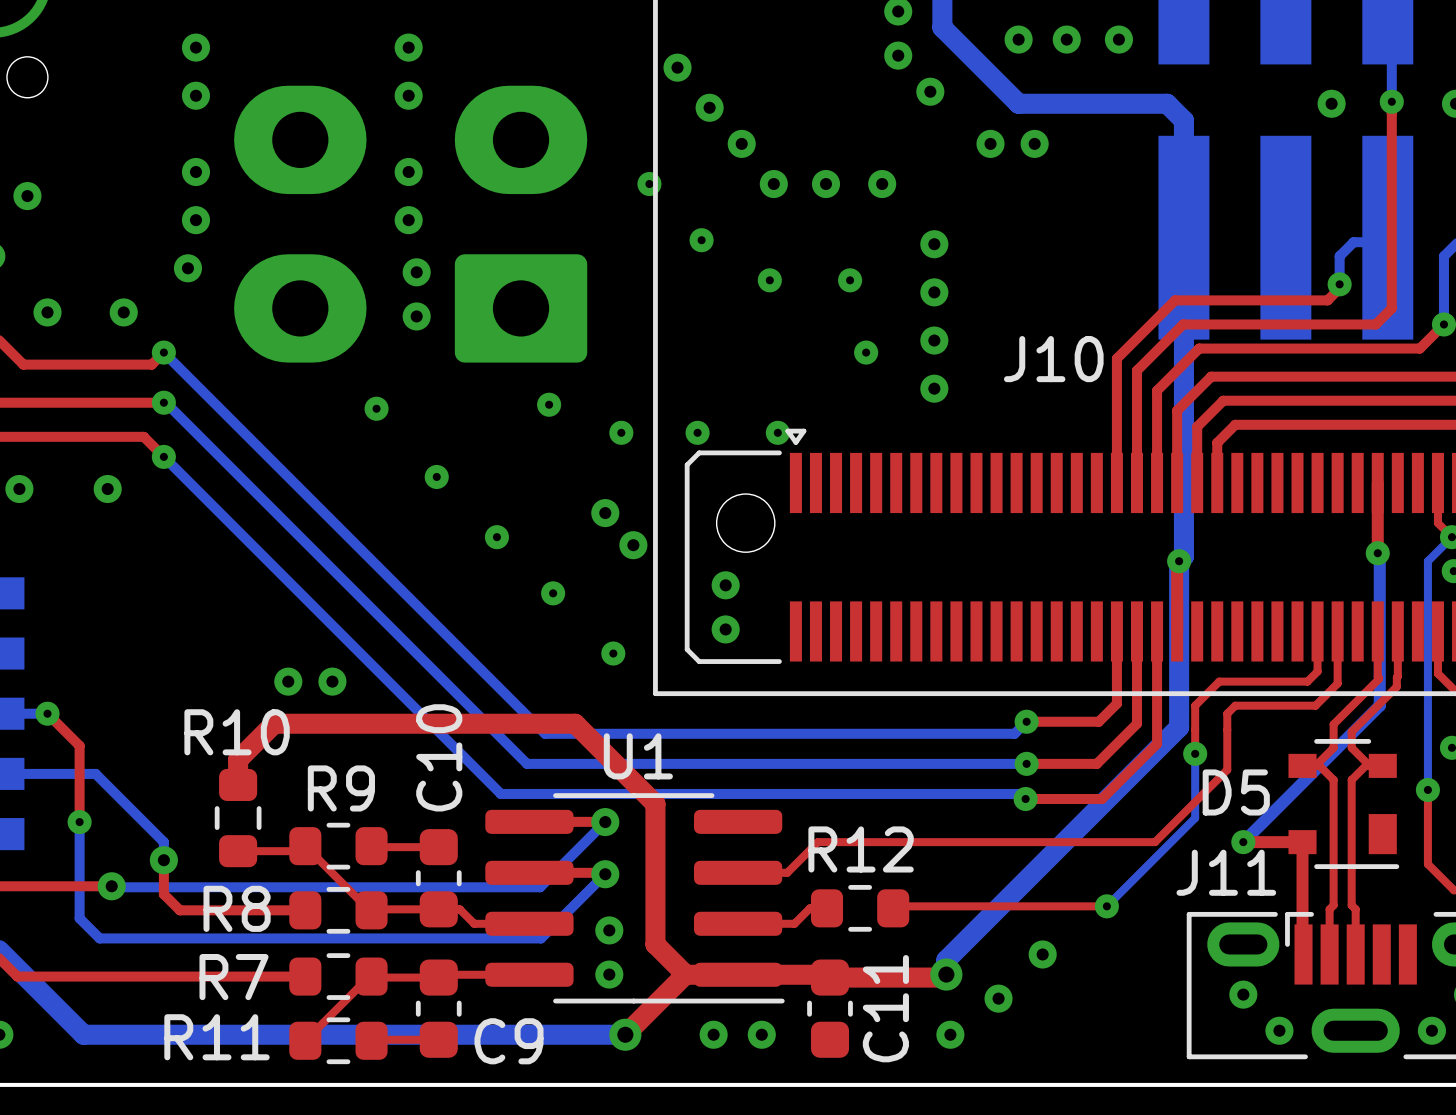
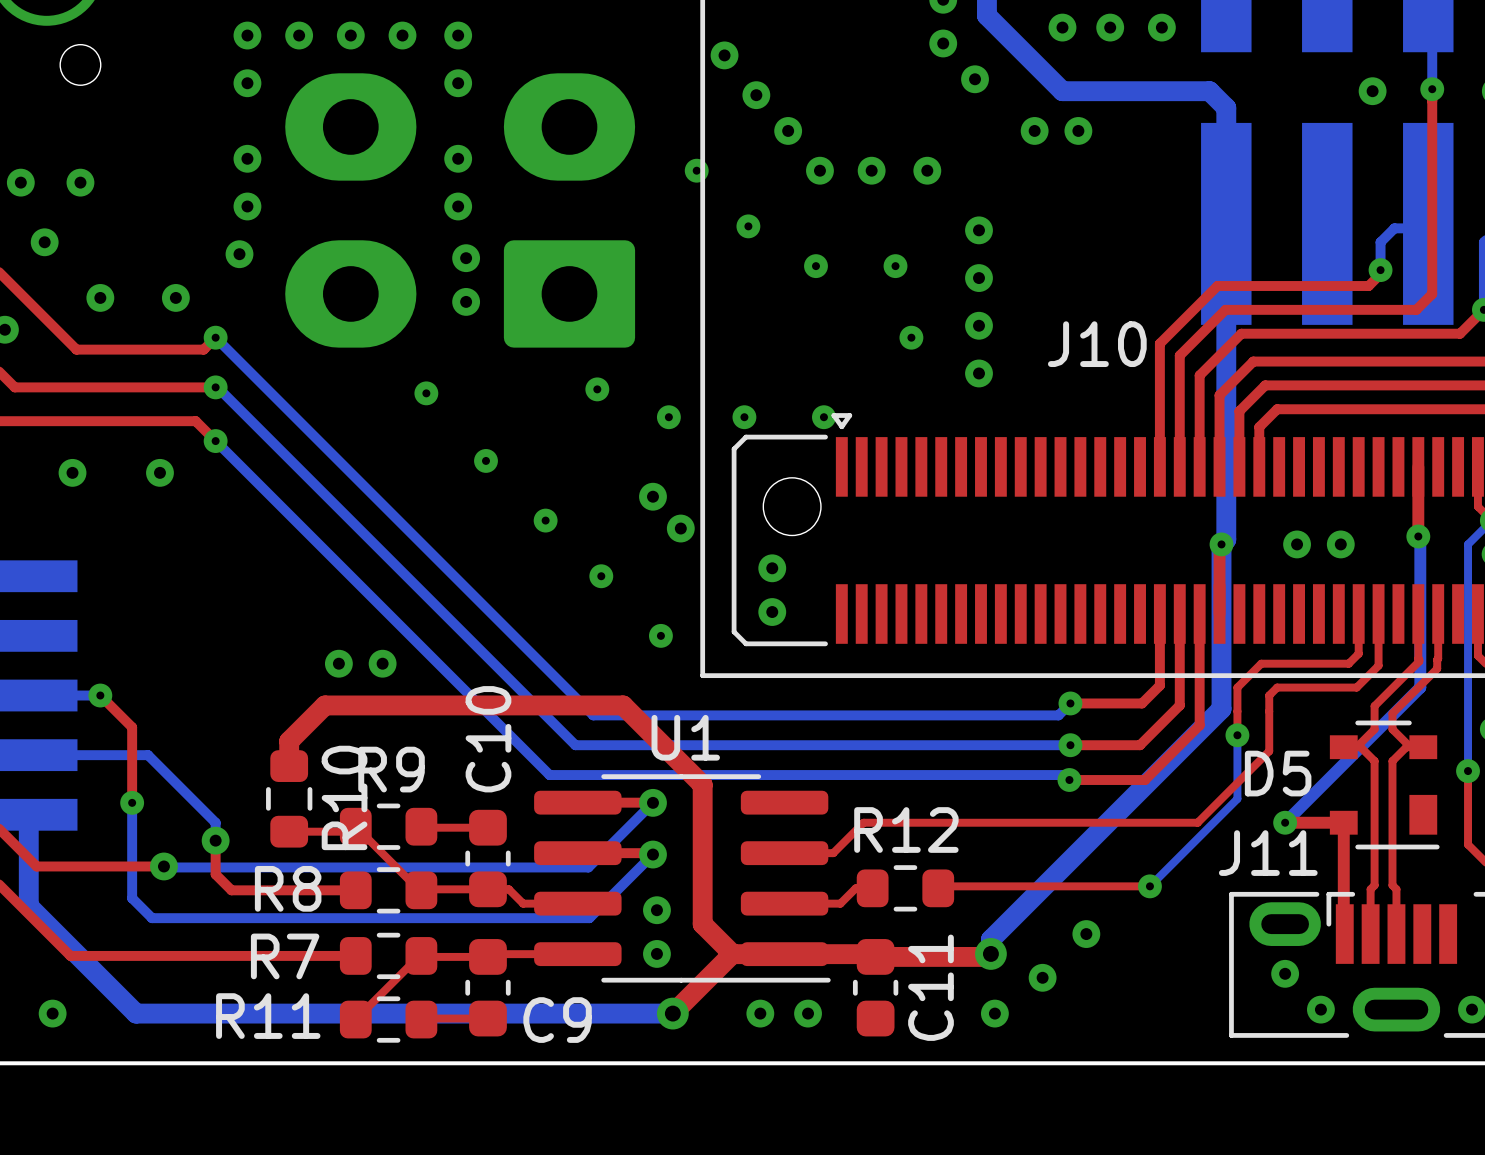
via: none -> (299, 35)
via: none -> (350, 35)
via: none -> (402, 35)
via: none -> (1297, 544)
via: none -> (1340, 544)
R10 name rotation: 0° (237, 732) -> 90° counterclockwise (344, 797)

